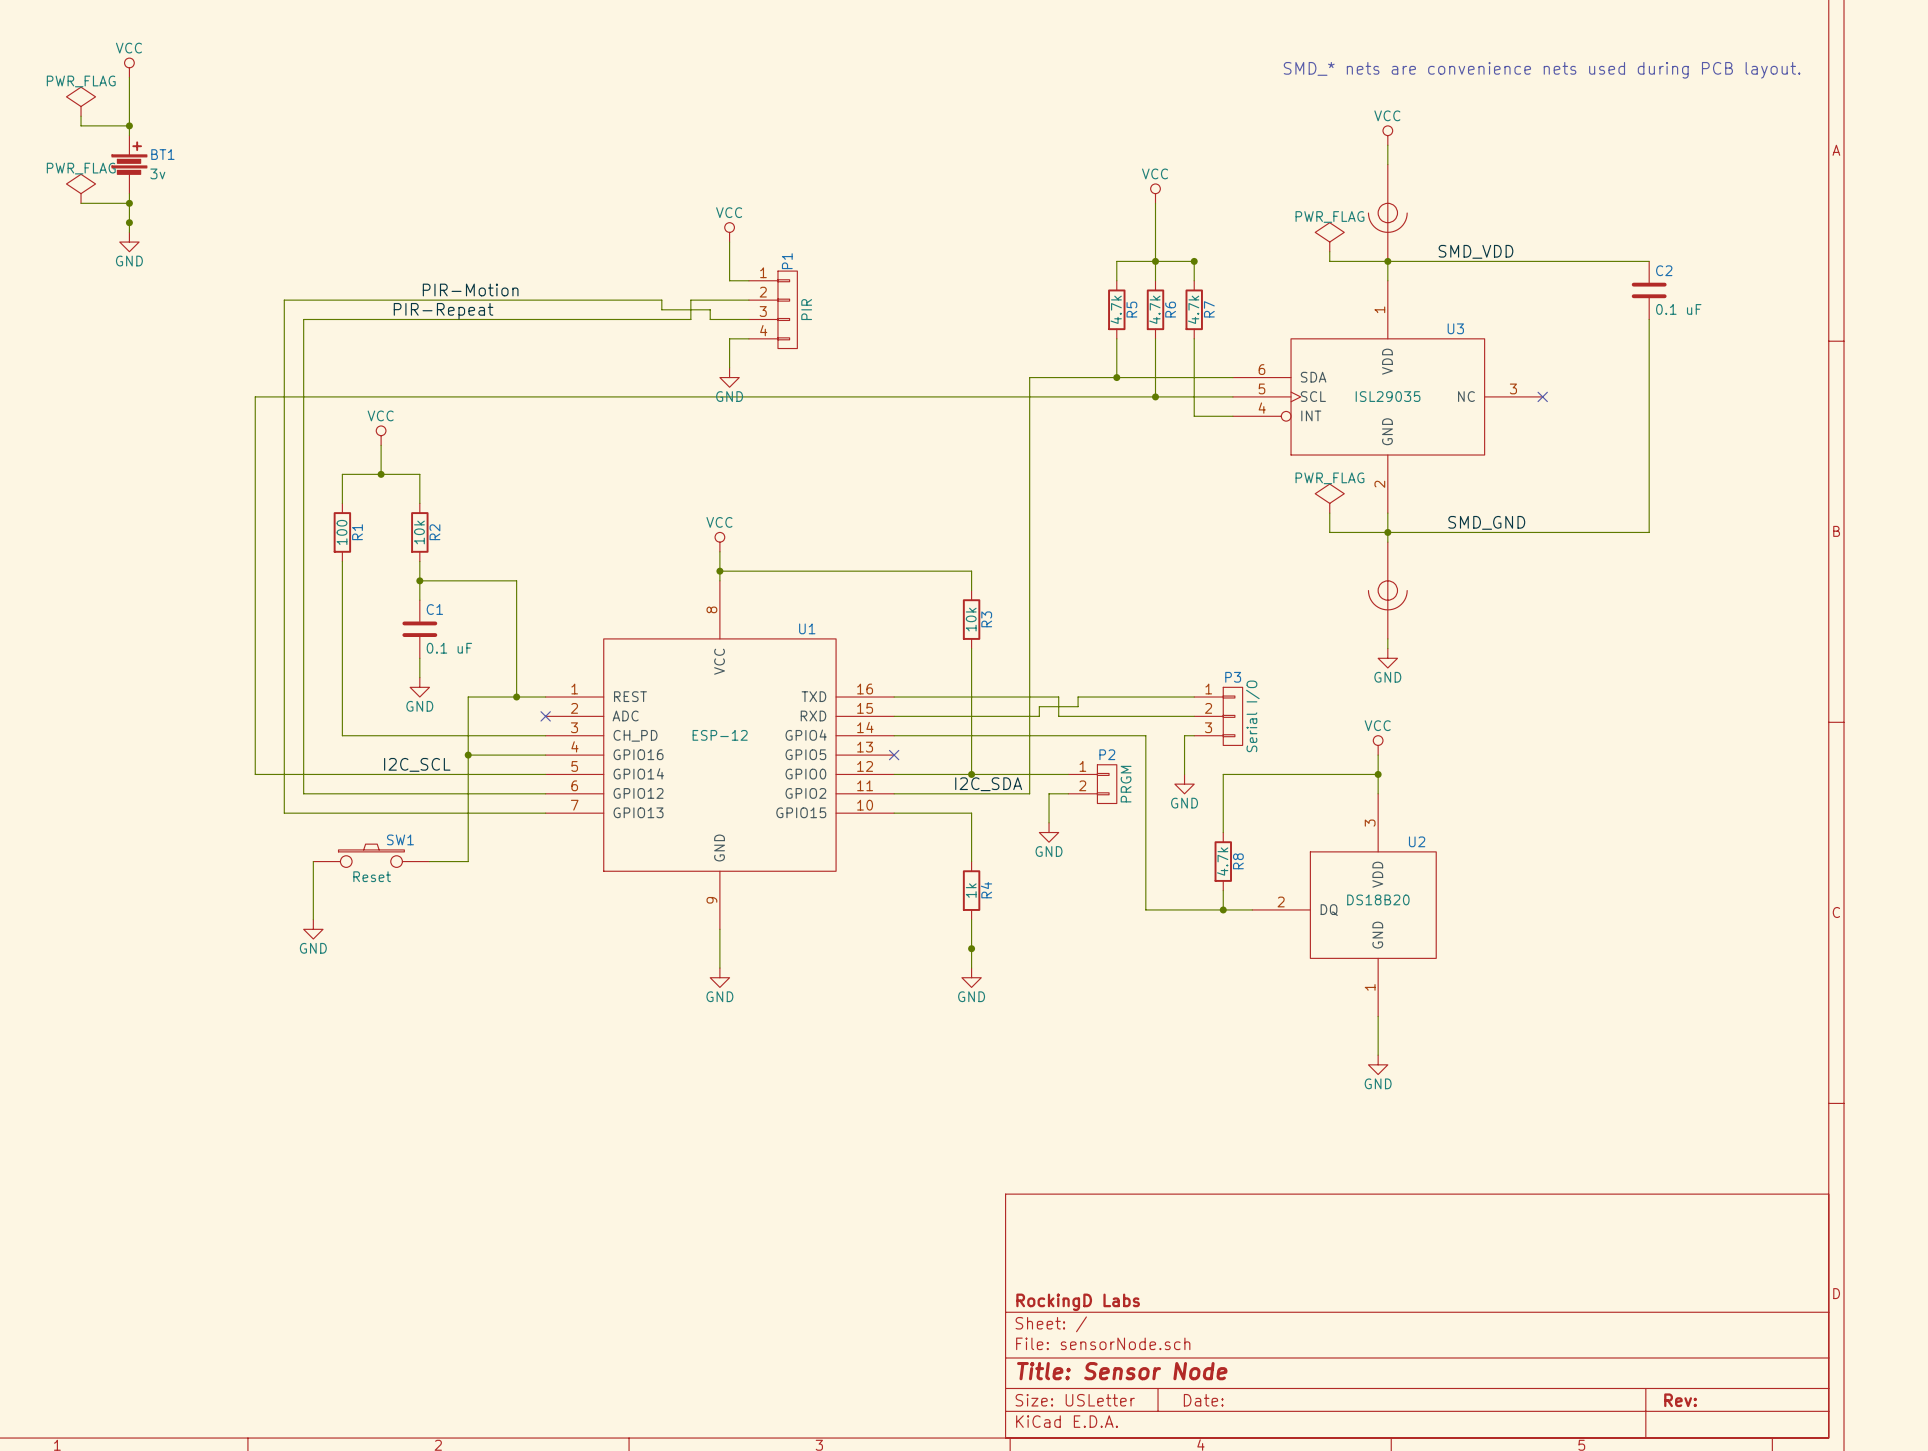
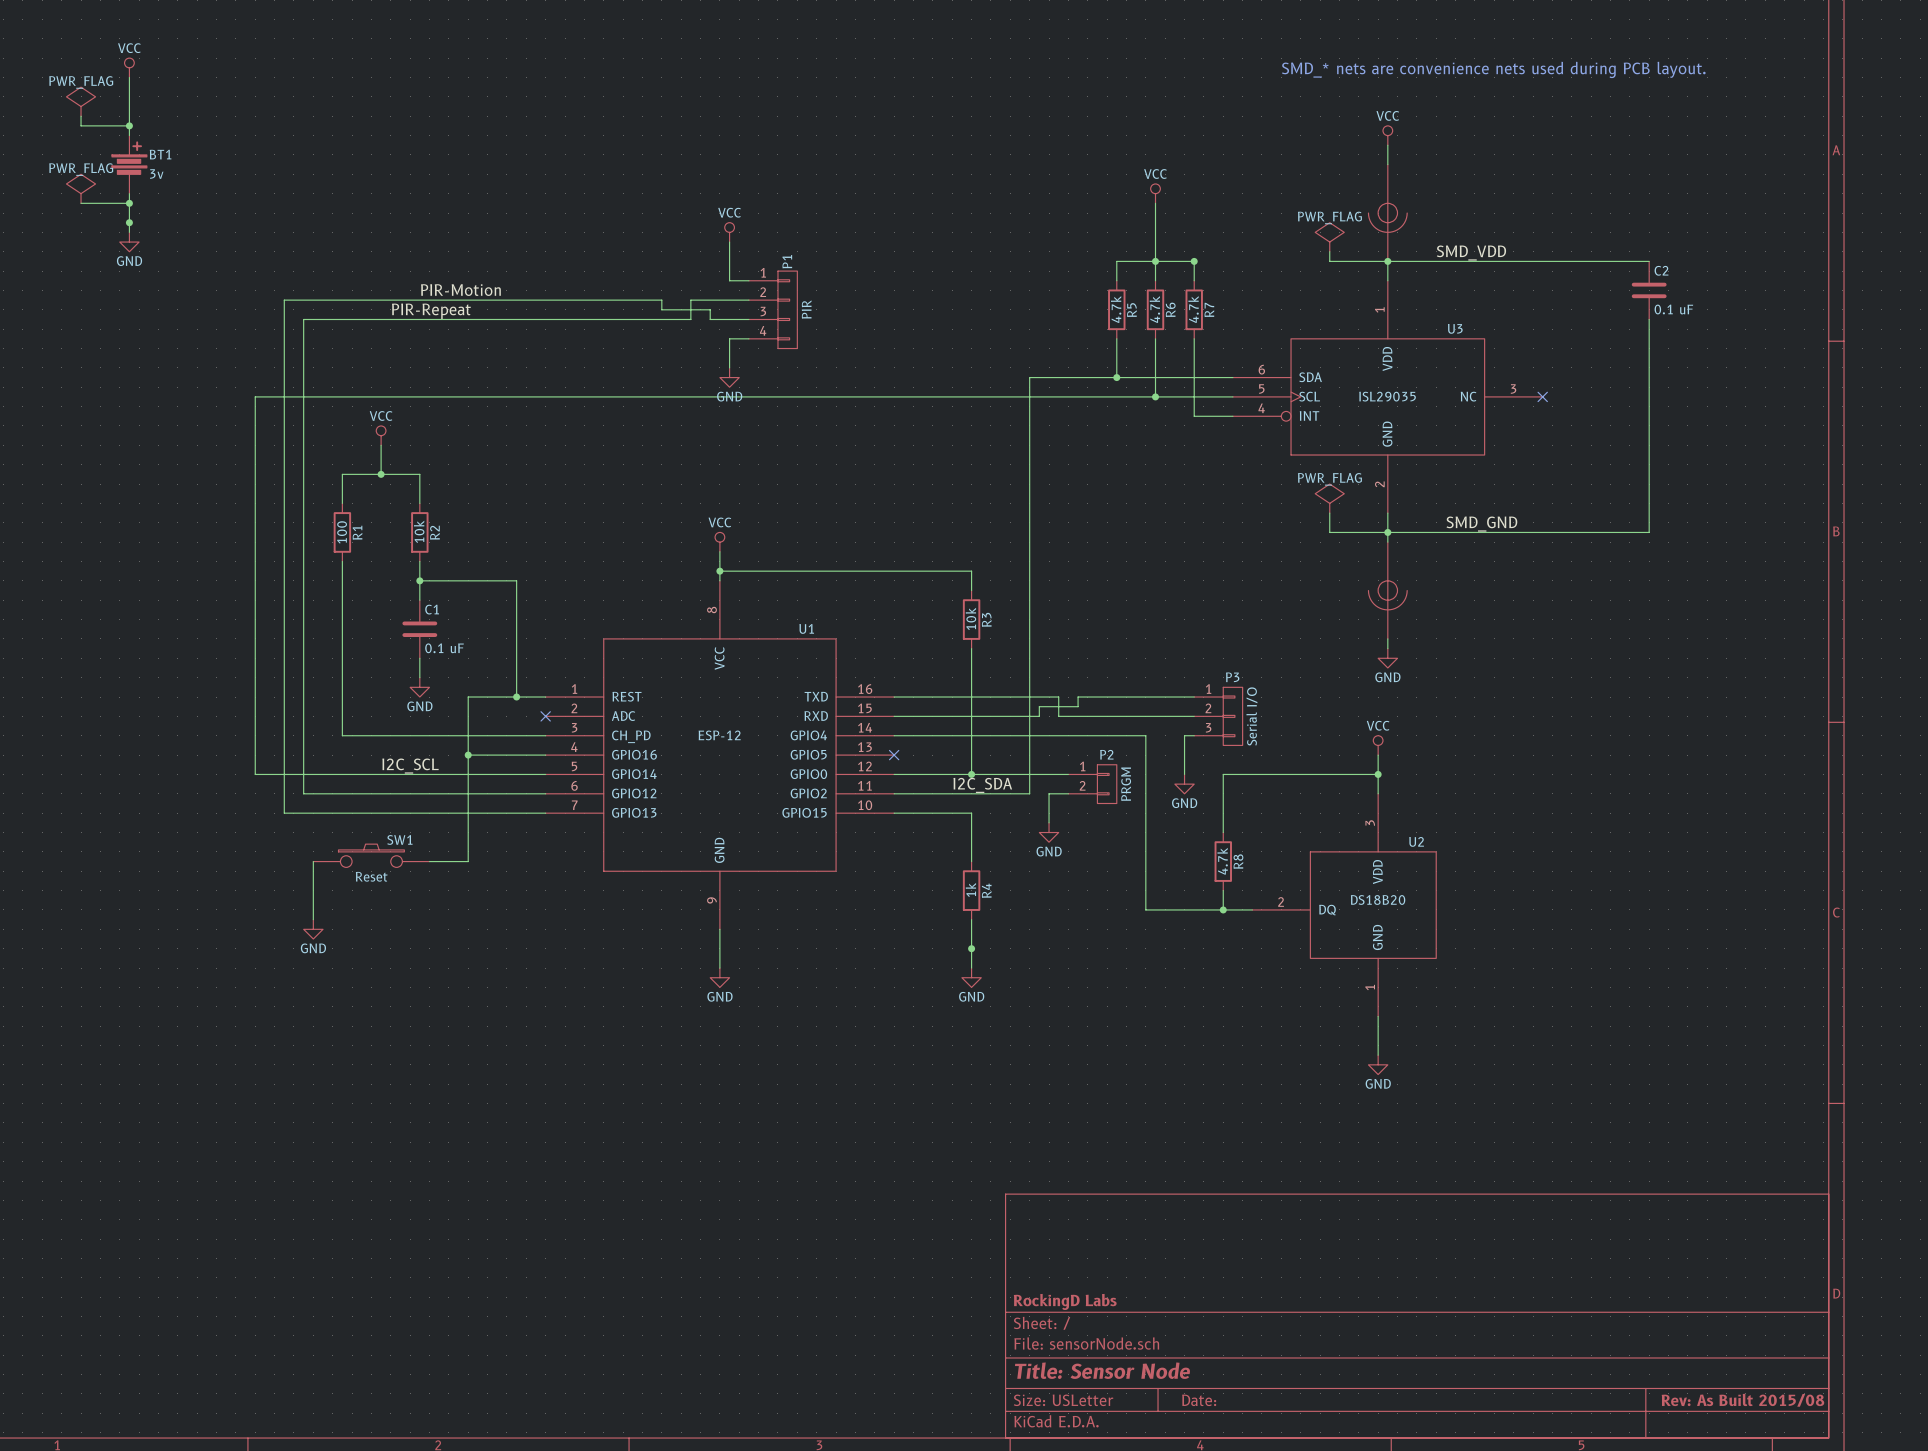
title block: Rev: (1680, 1400) -> Rev: As Built 2015/08 (1742, 1400)

